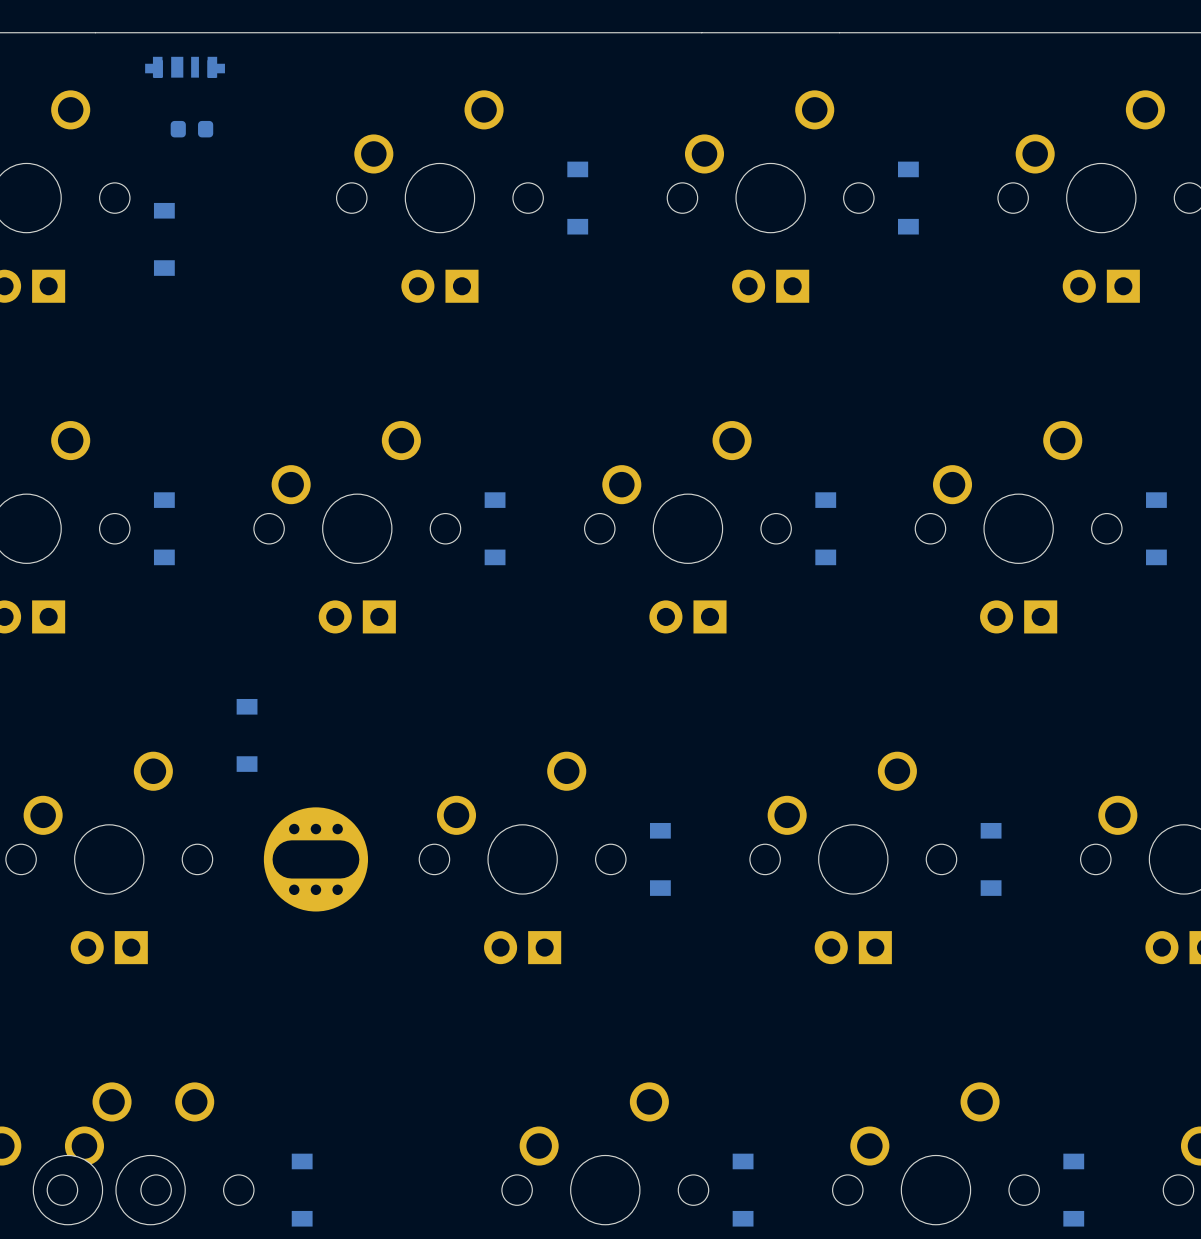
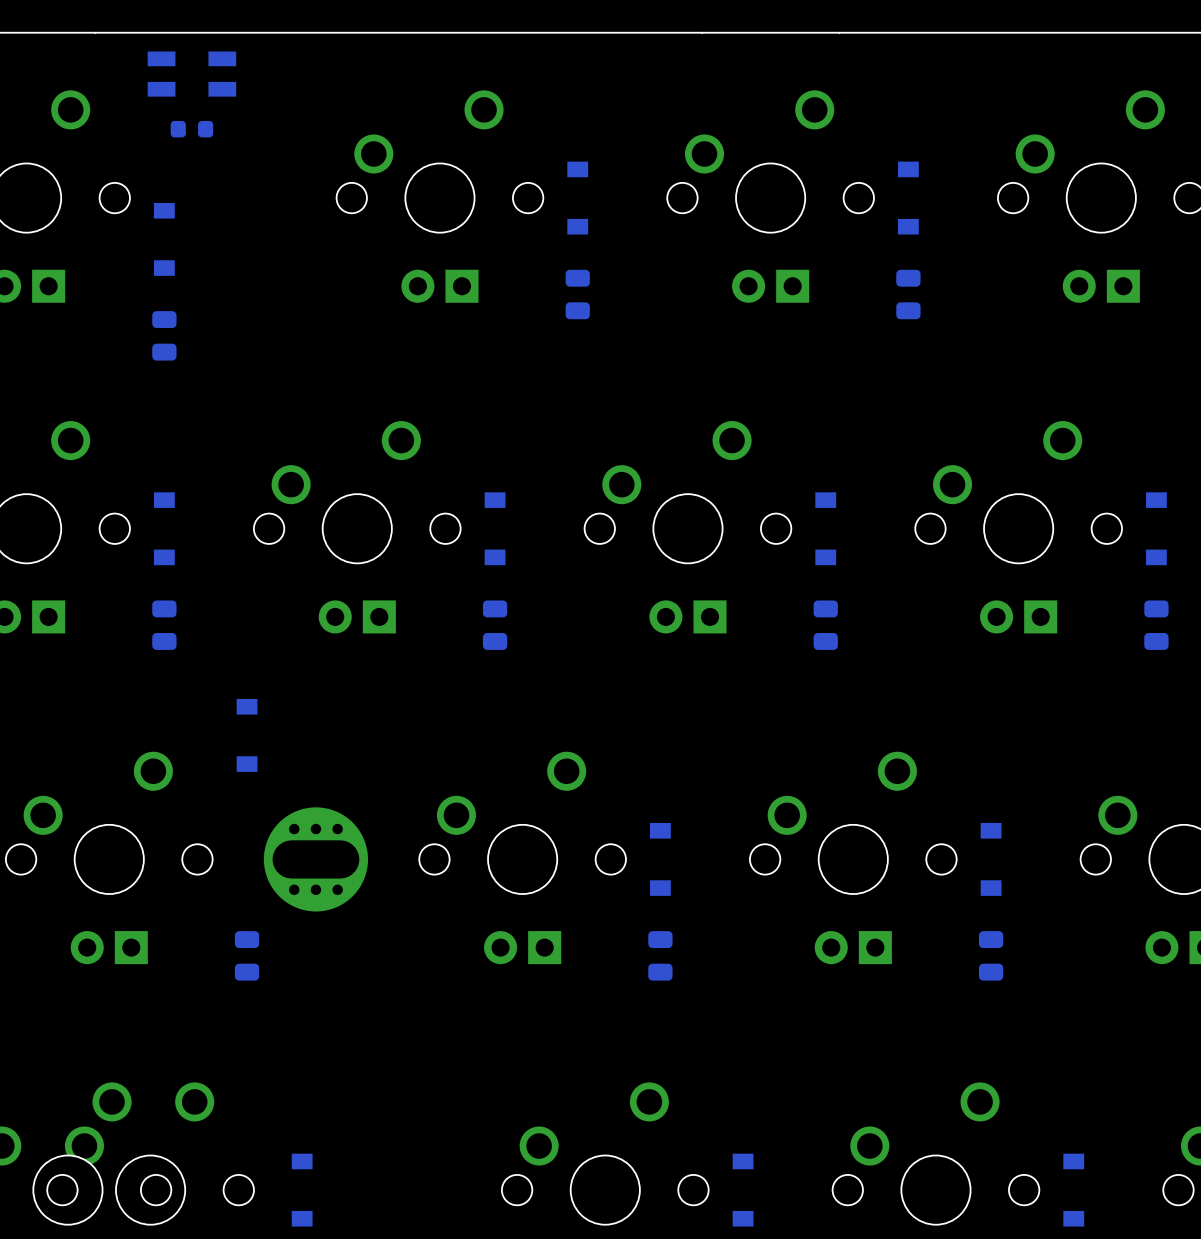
part footprint: [145, 56, 225, 78] -> [147, 51, 237, 97]
part: none -> (577, 294)
part: none -> (908, 294)
part: none -> (164, 335)
part: none -> (164, 625)
part: none -> (495, 625)
part: none -> (825, 625)
part: none -> (1156, 625)
part: none -> (247, 955)
part: none -> (660, 955)
part: none -> (991, 955)

